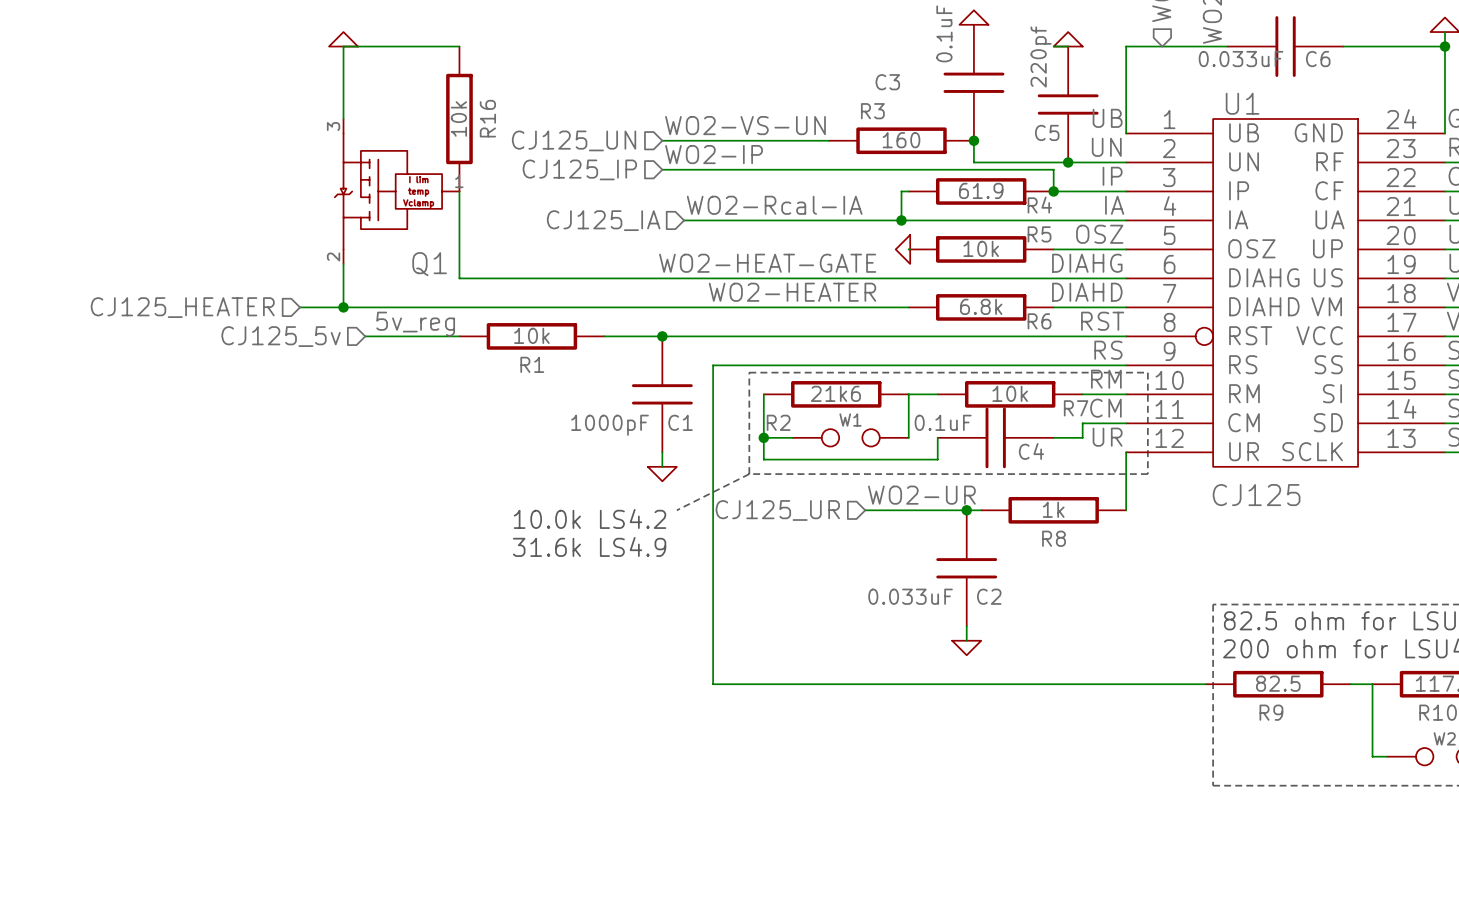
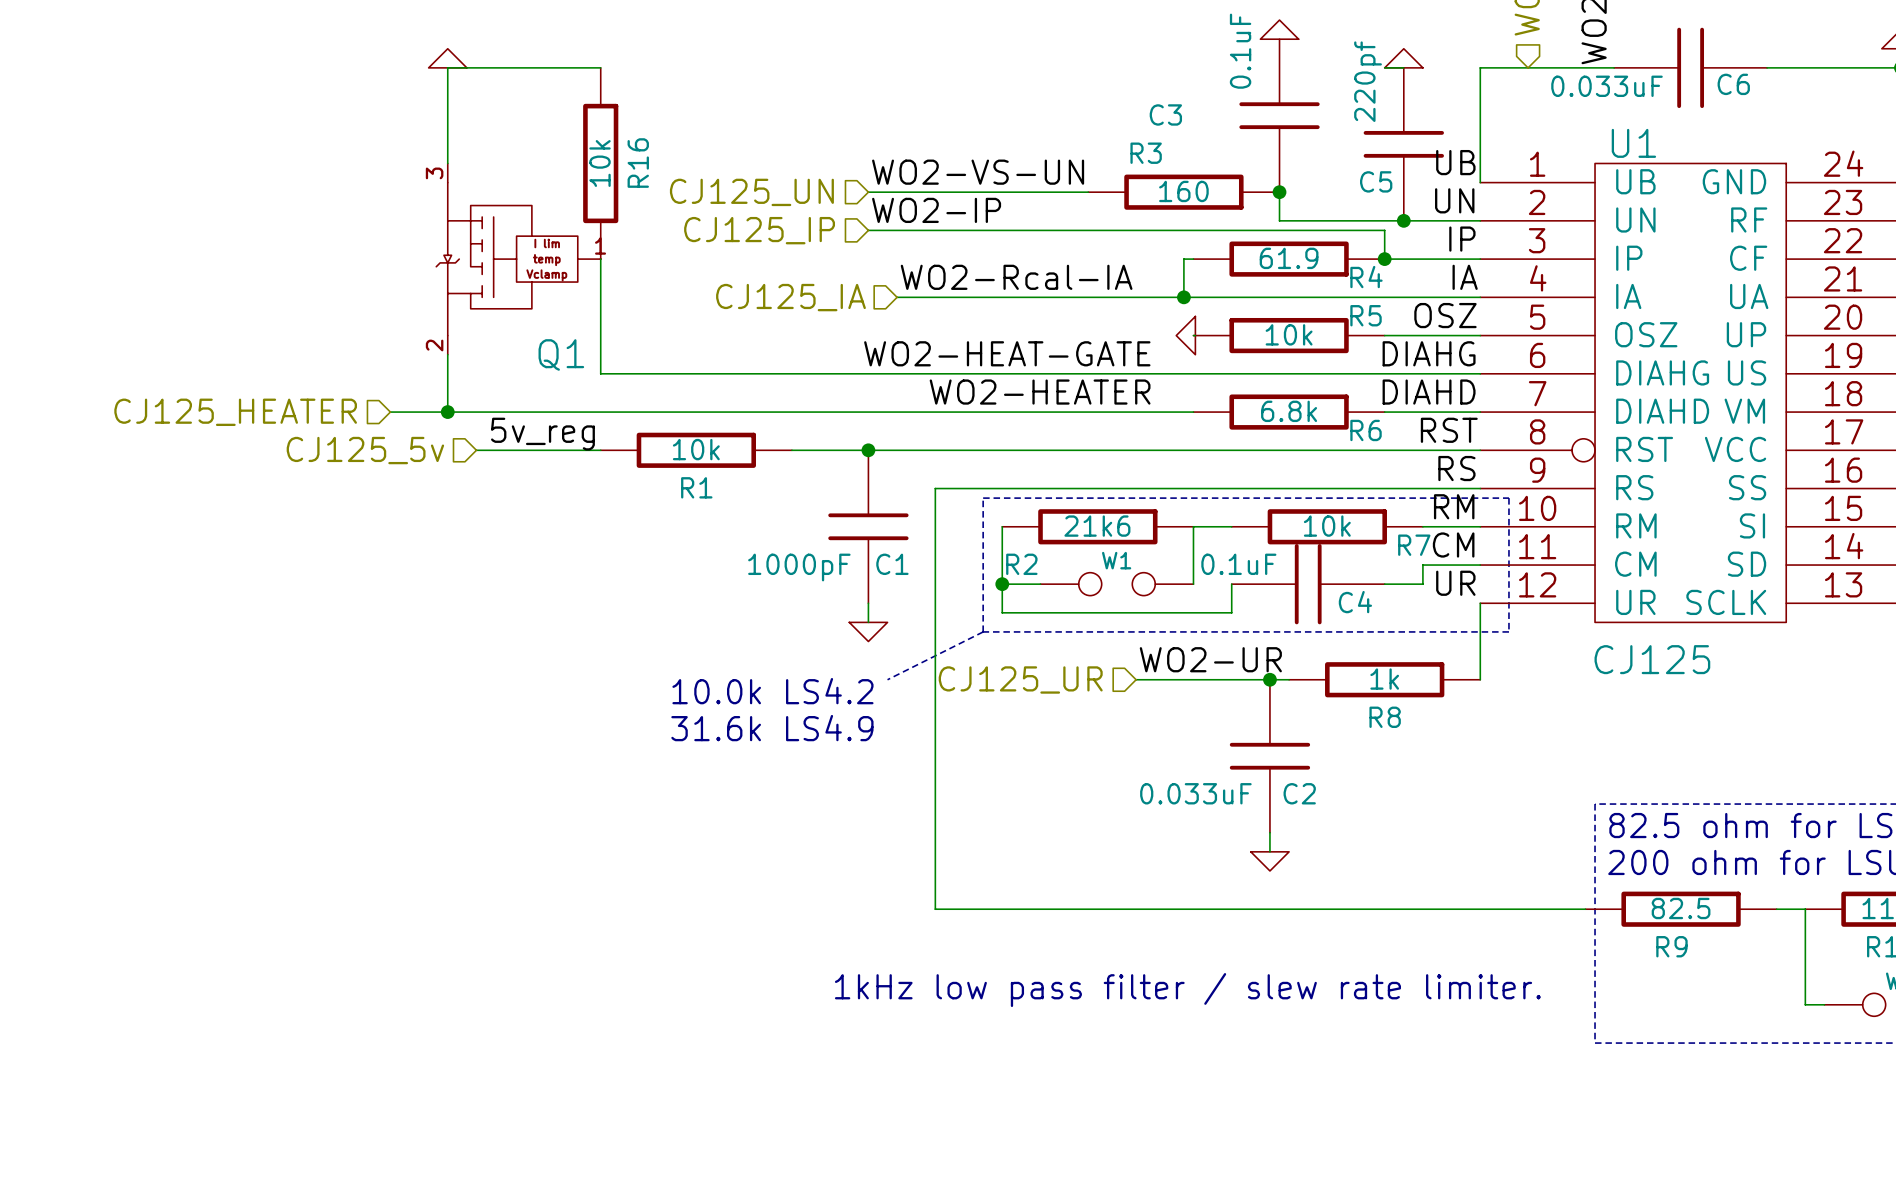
C6 value position: 0.033uF (1241, 59) -> 0.033uF (1607, 86)
text: none -> 1kHz low pass filter / slew rate limiter. (1187, 990)

